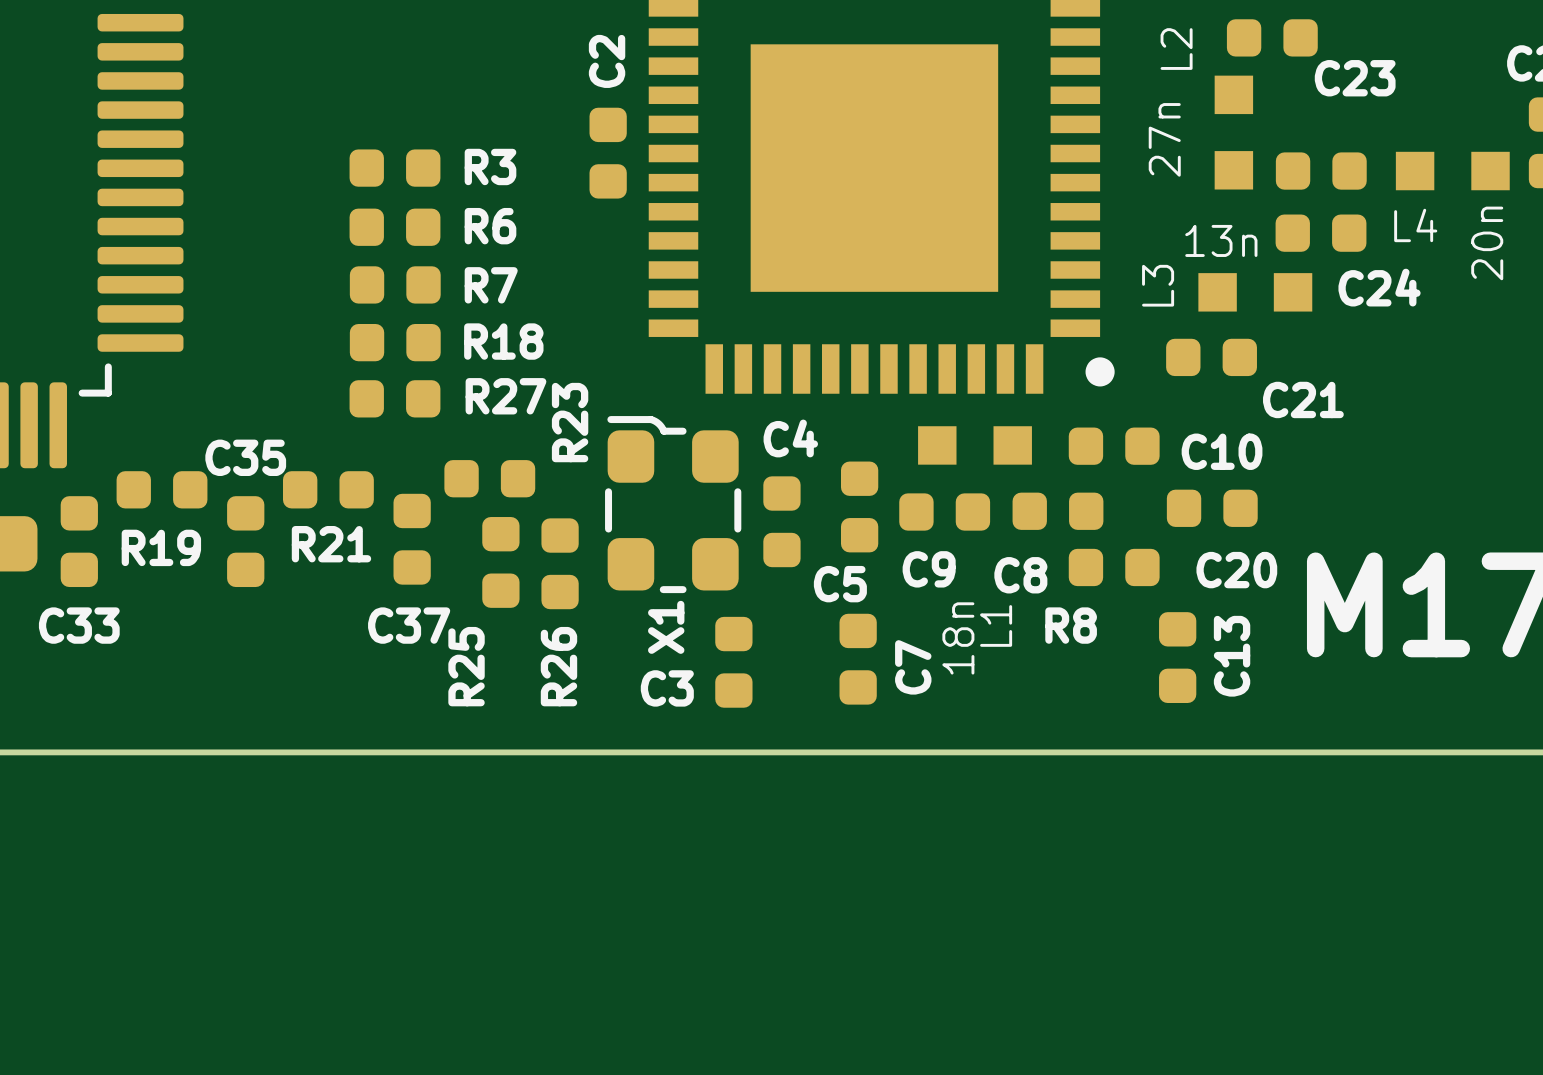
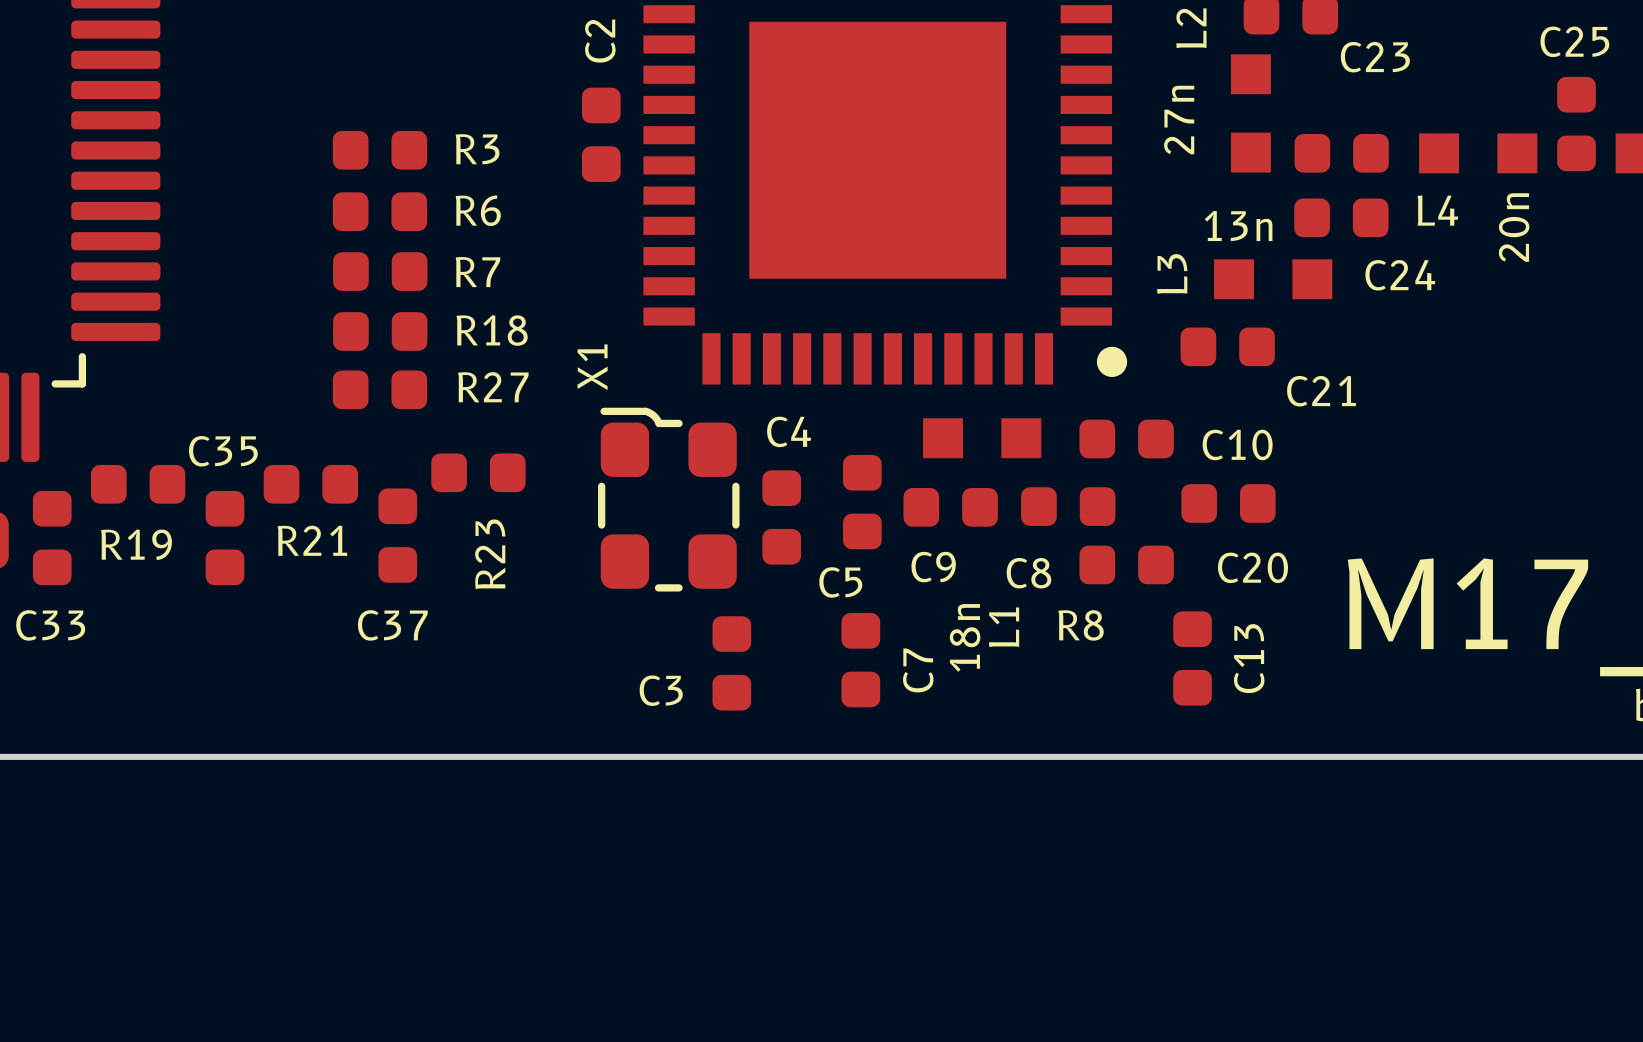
R23 name position: R23 (570, 422) -> R23 (490, 554)
R25: (500, 562) -> none
R26: (560, 563) -> none
X1 name position: X1 (666, 627) -> X1 (592, 367)

